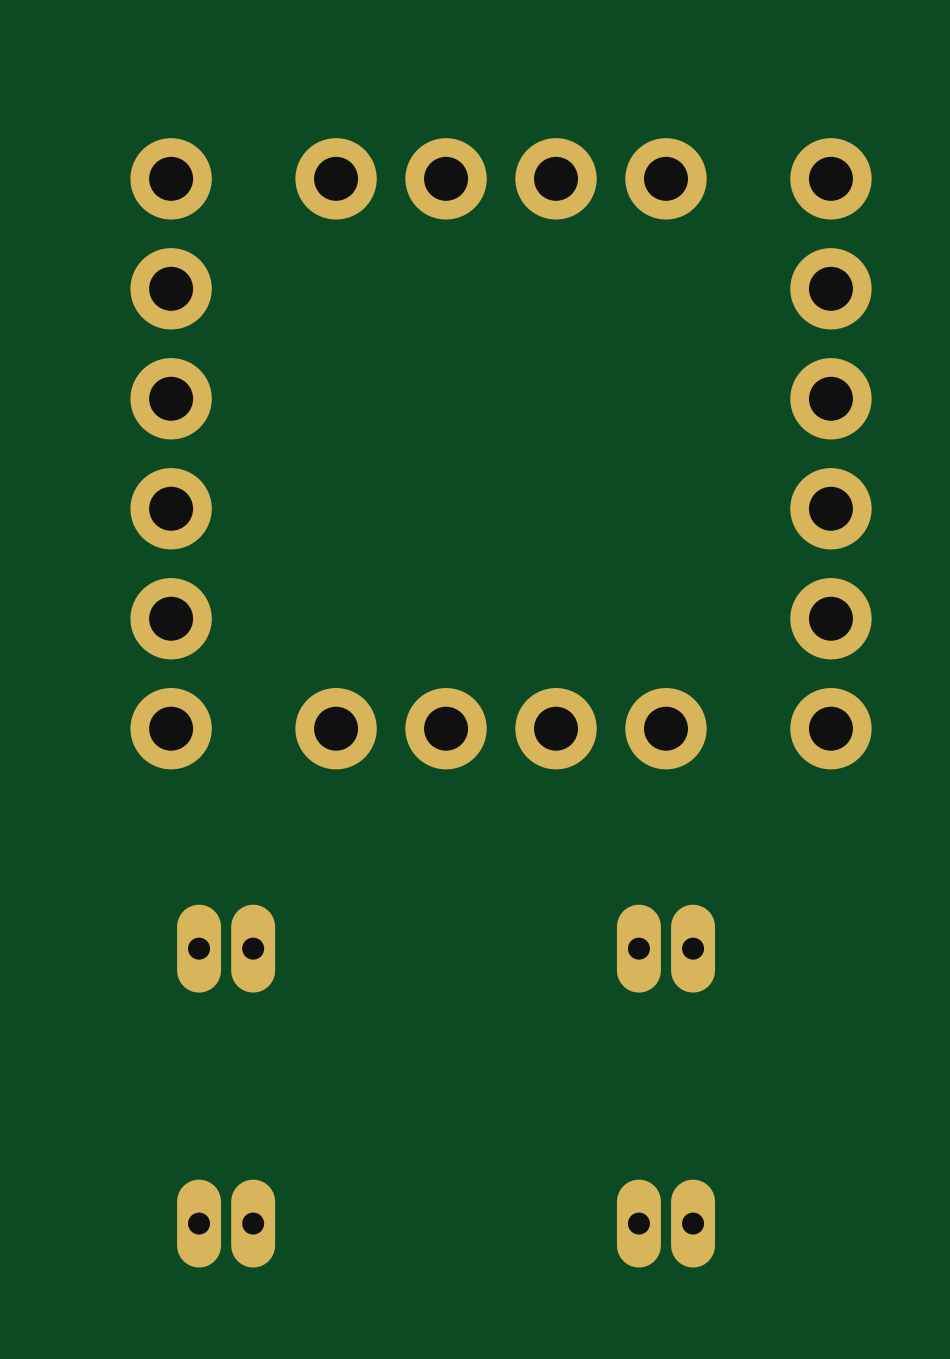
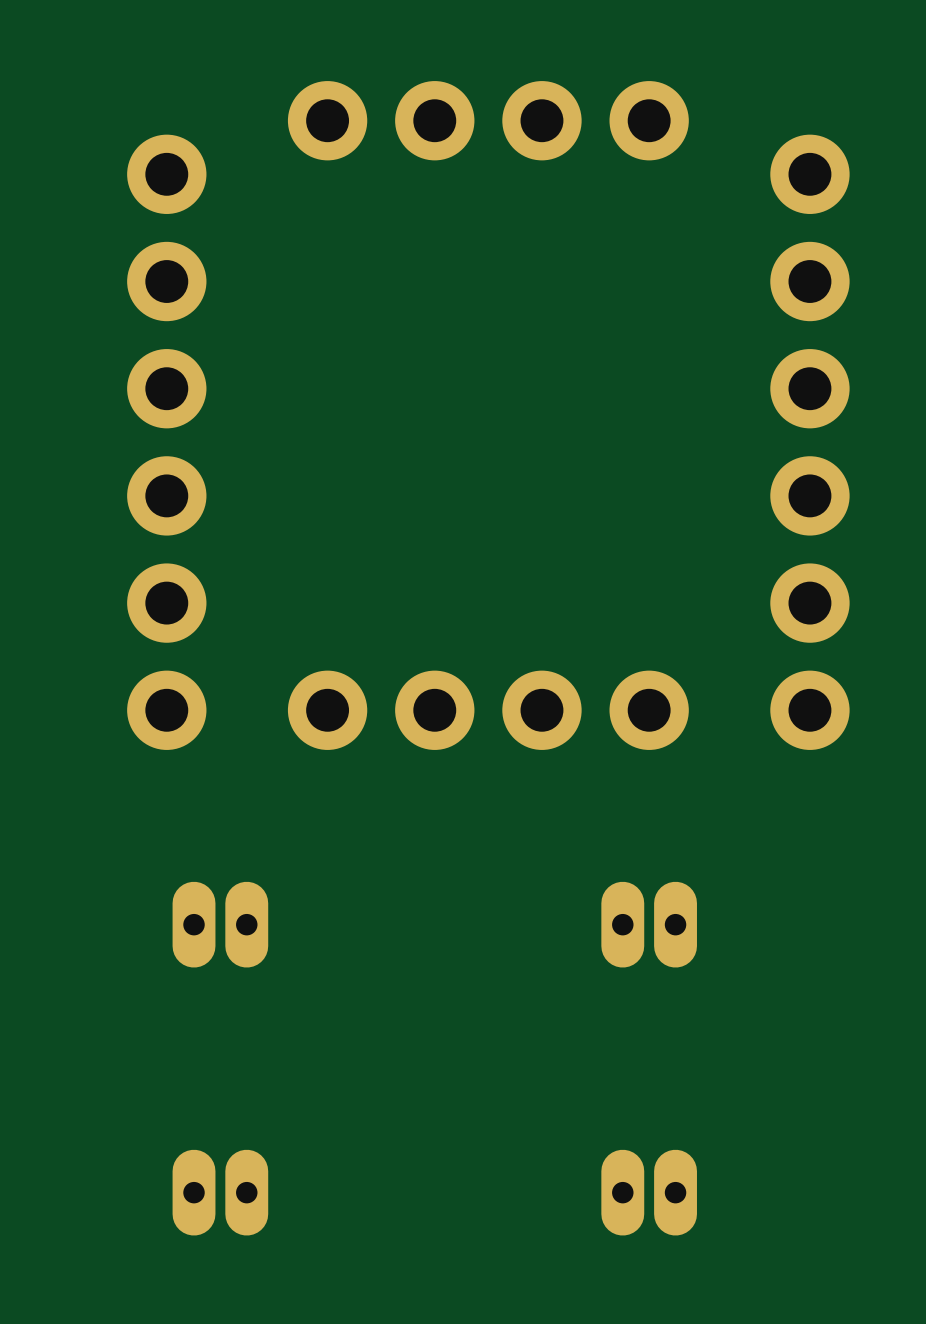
part position: (501, 178) -> (488, 120)

